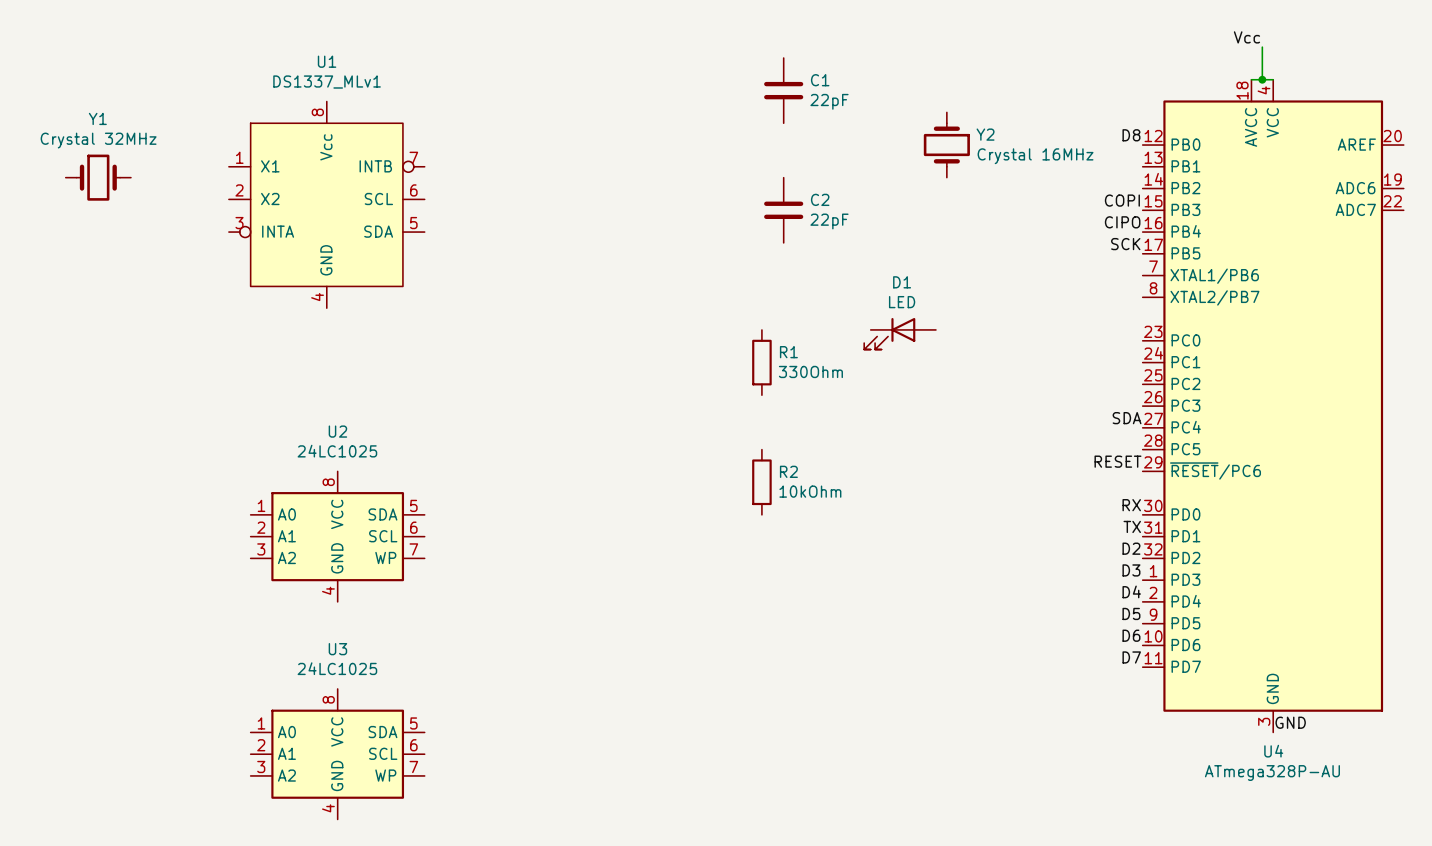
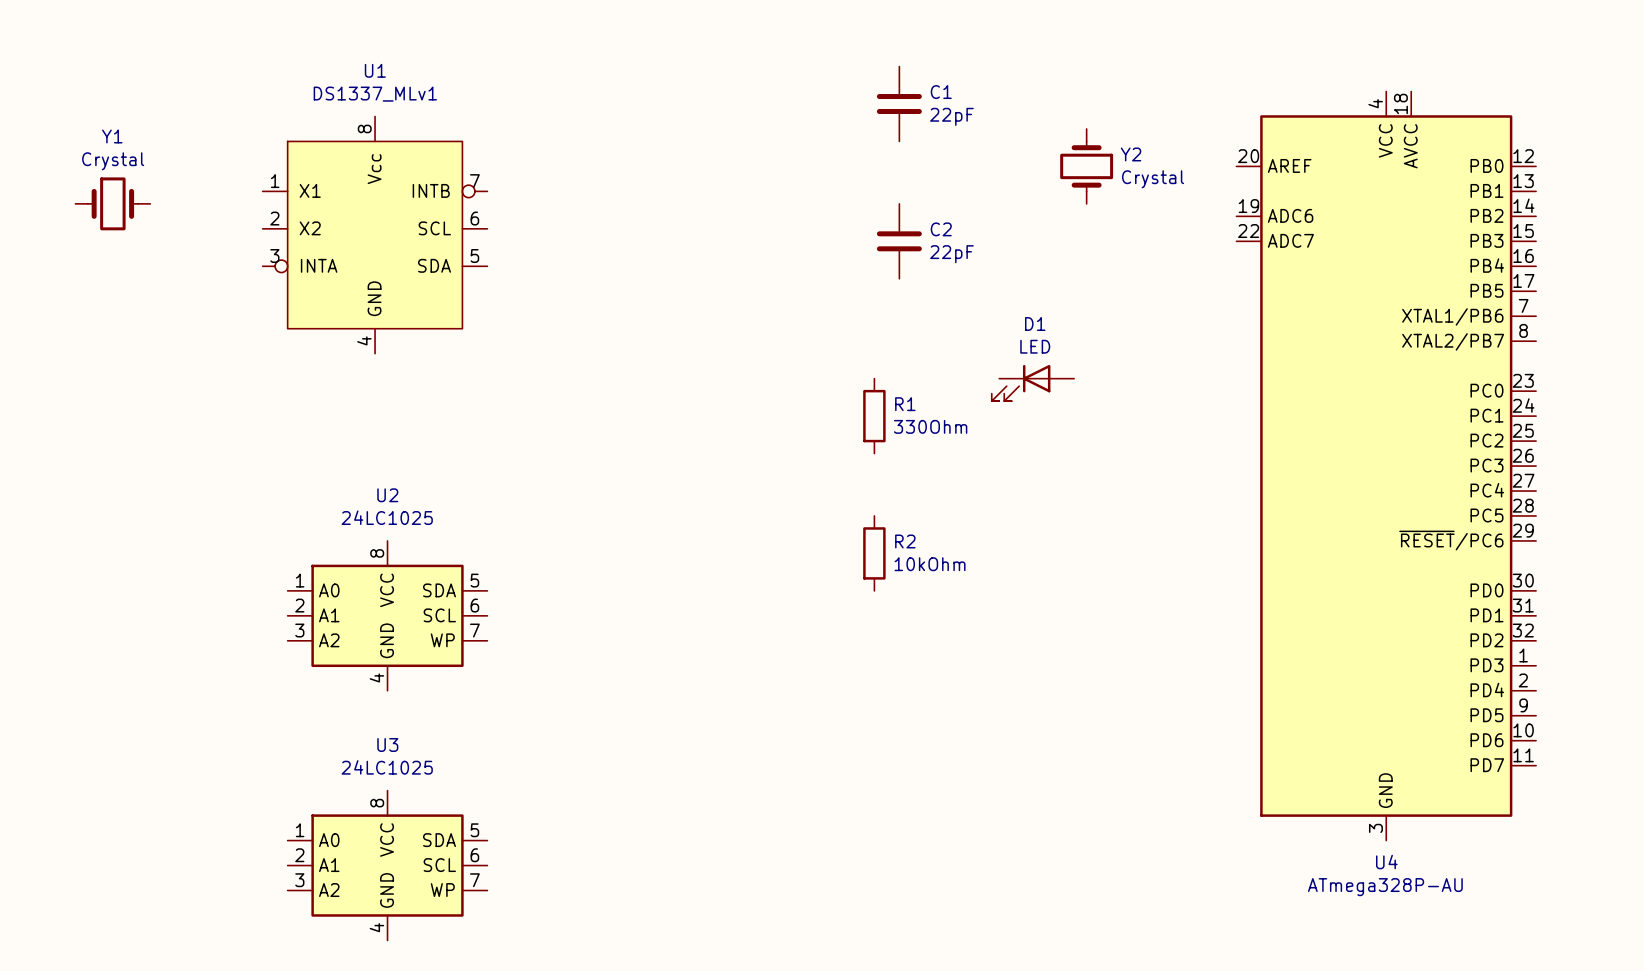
label: Vcc (1246, 37) -> none
wire: (1262, 47) (1262, 79) -> none
wire: (1251, 79) (1273, 79) -> none
junction: (1262, 79) -> none
label: D8 (1131, 135) -> none
Y1 value: Crystal 32MHz (98, 140) -> Crystal (113, 161)
Y2 value: Crystal 16MHz (1035, 156) -> Crystal (1153, 179)
label: COPI (1122, 200) -> none
label: CIPO (1122, 222) -> none
label: SCK (1125, 244) -> none
U4 flip: as is (1273, 406) -> left-right (1386, 466)
label: SDA (1127, 418) -> none
label: RESET (1117, 461) -> none
label: RX (1131, 505) -> none
label: TX (1132, 526) -> none
label: D2 (1131, 548) -> none
label: D3 (1131, 570) -> none
label: D4 (1131, 591) -> none
label: D5 (1131, 613) -> none
label: D6 (1131, 635) -> none
label: D7 (1131, 657) -> none
label: GND (1290, 722) -> none

